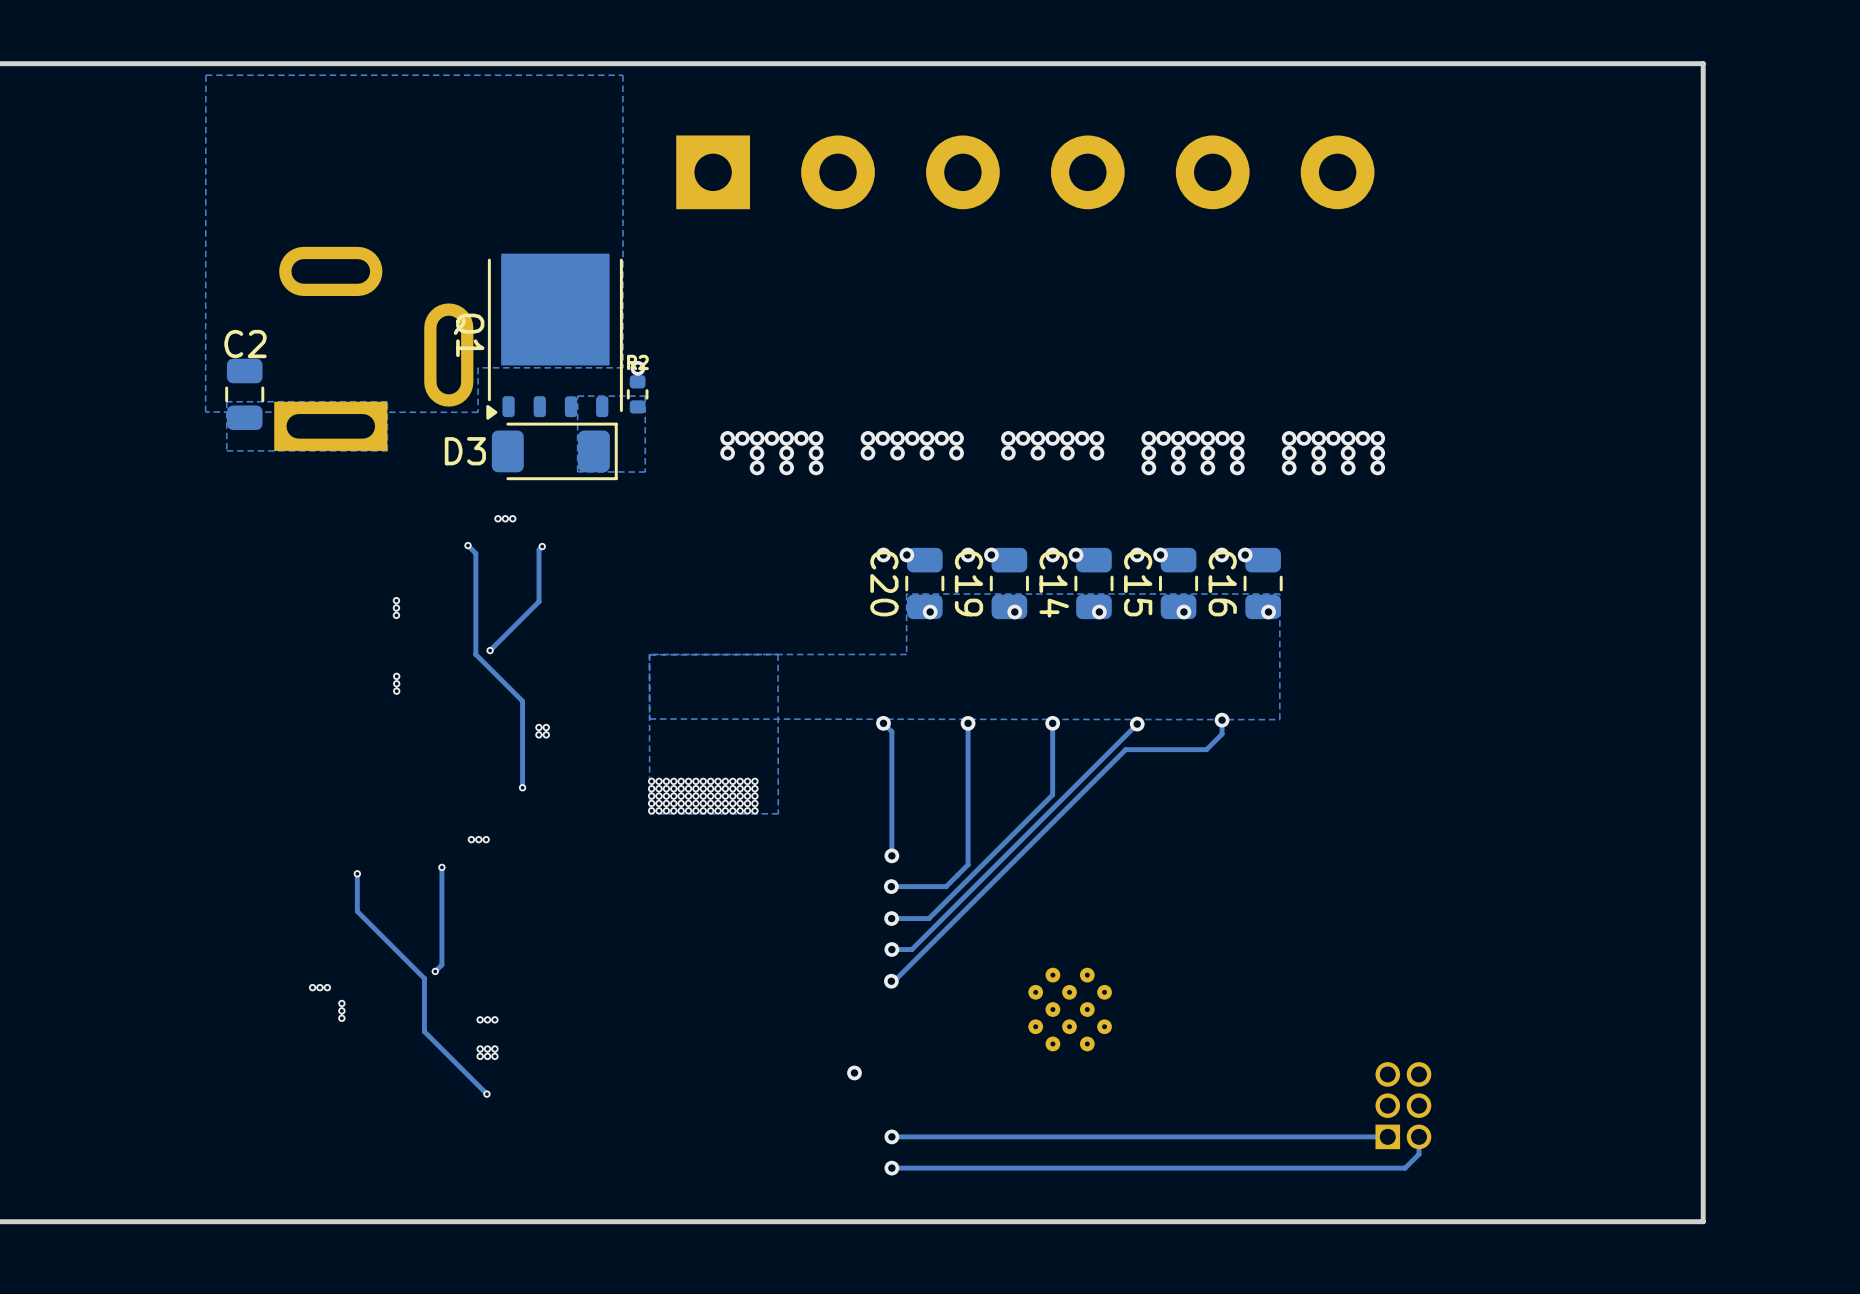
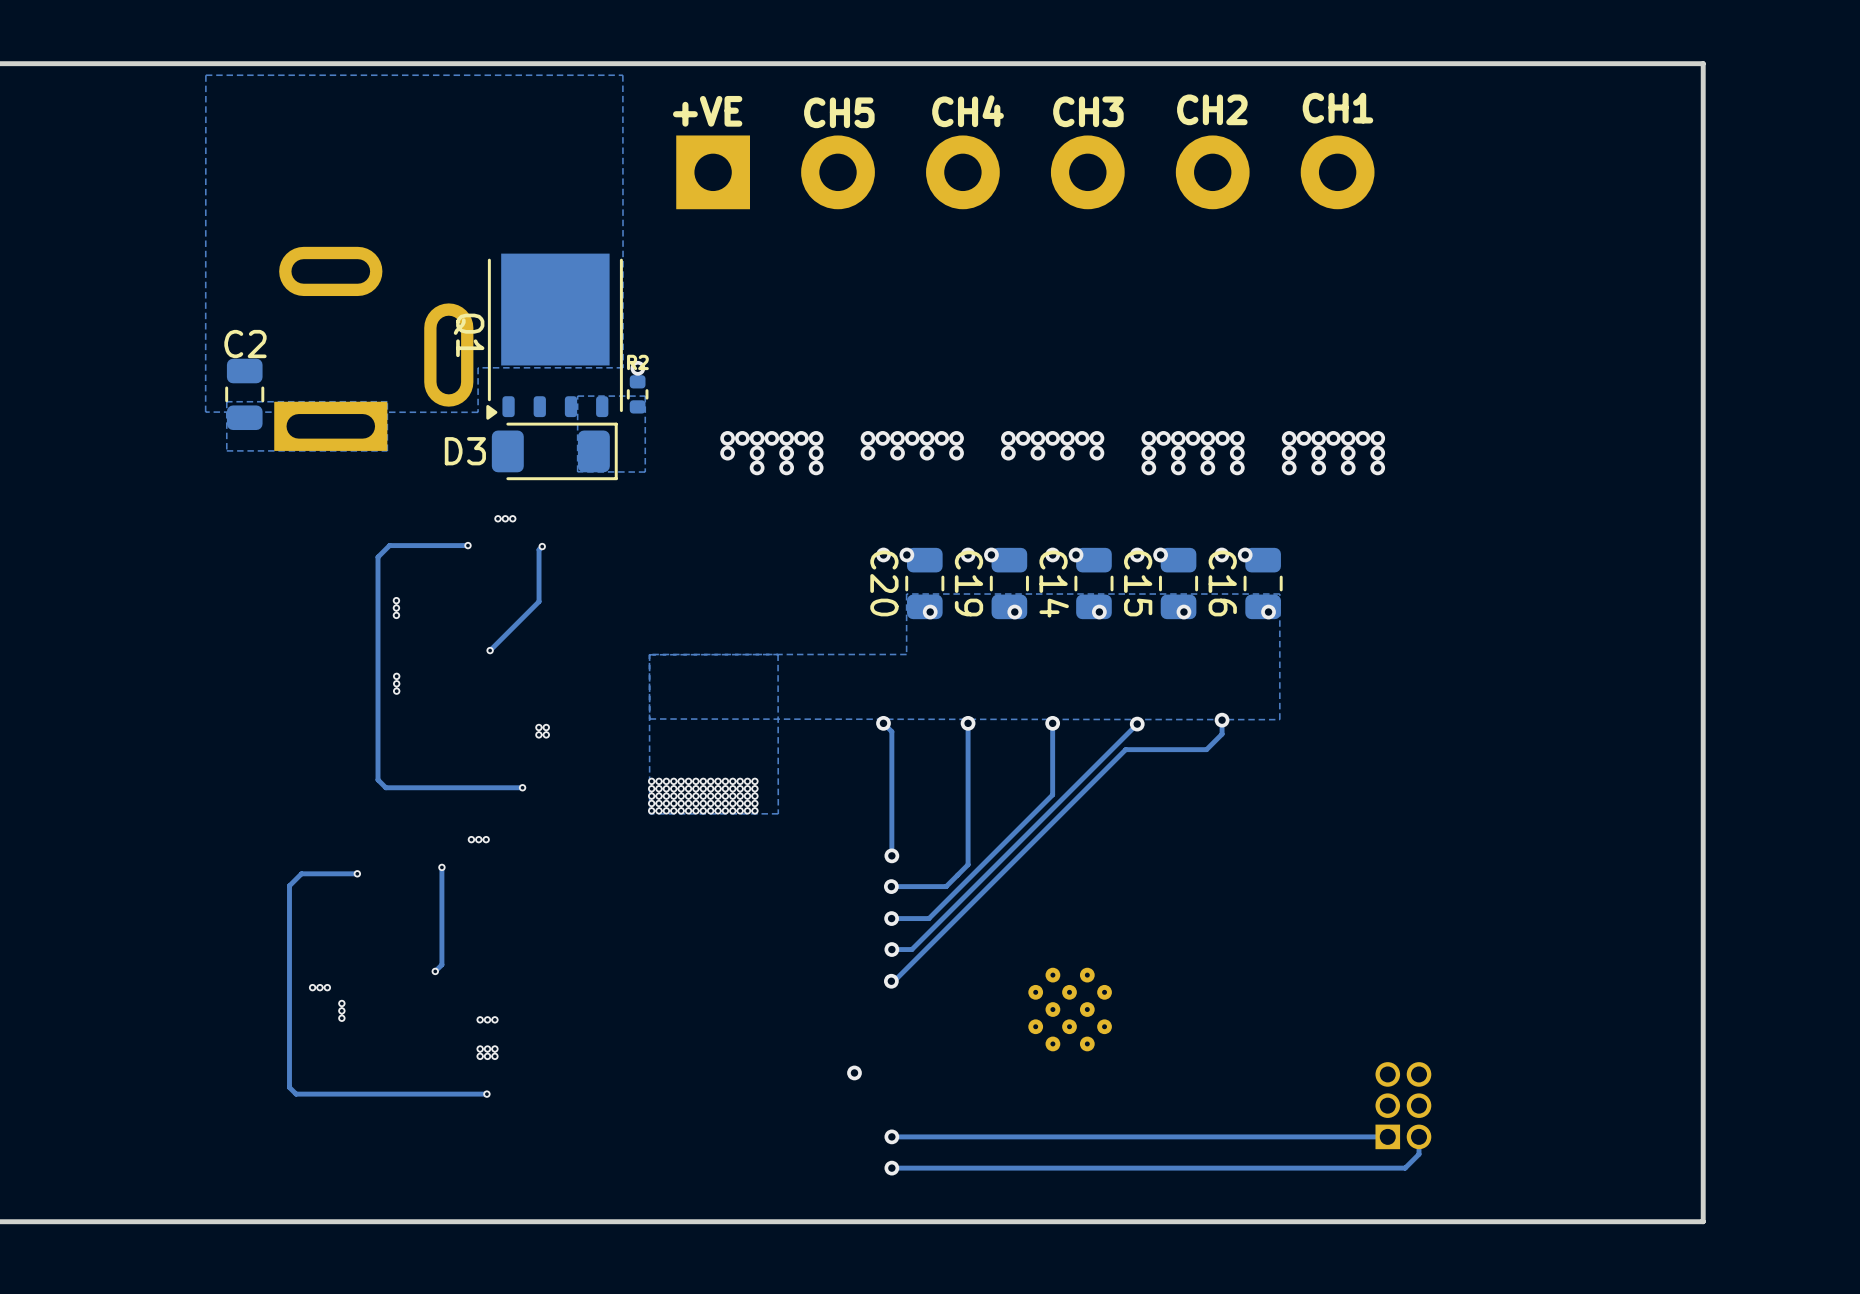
text: none -> CH1 (1337, 108)
text: none -> CH2 (1212, 109)
text: none -> +VE (707, 111)
text: none -> CH4 (968, 111)
text: none -> CH3 (1088, 111)
text: none -> CH5 (839, 112)
track: (467, 545) (475, 553) (475, 654) (522, 701) (522, 787) -> (467, 545) (389, 545) (377, 557) (377, 779) (385, 787) (522, 787)
track: (357, 873) (357, 911) (424, 978) (424, 1031) (486, 1094) -> (357, 873) (301, 873) (289, 885) (289, 1087) (296, 1094) (486, 1094)

